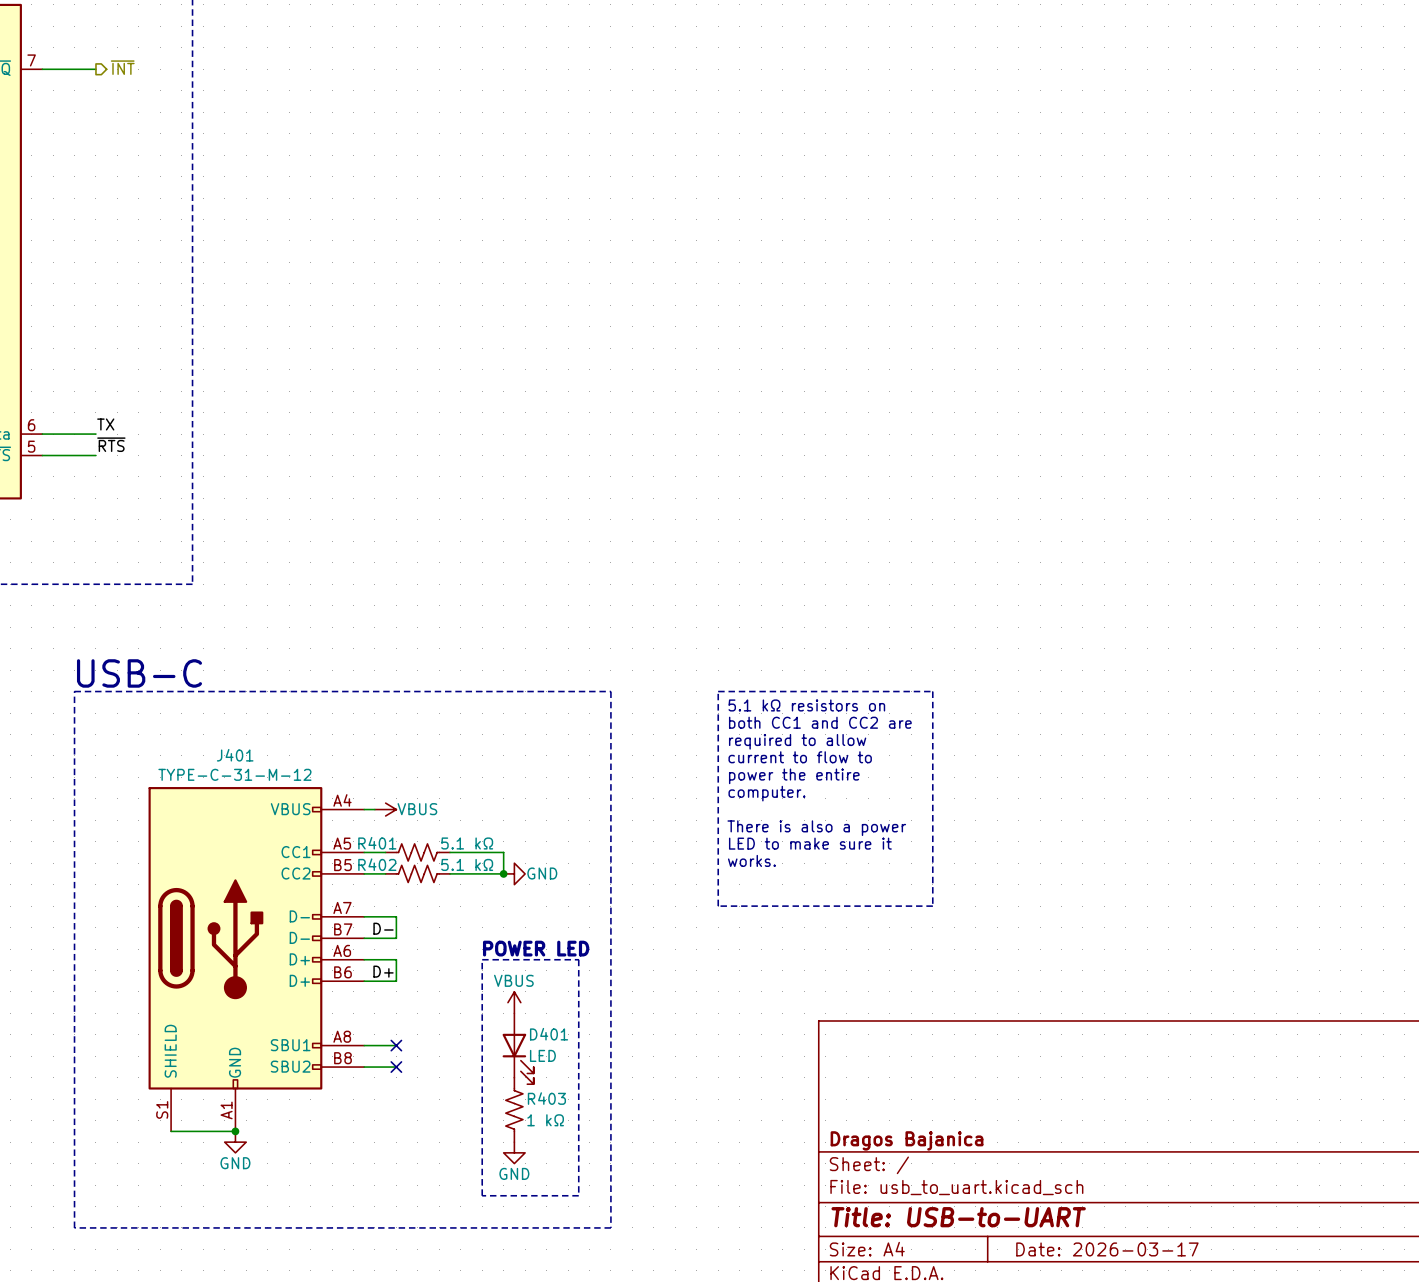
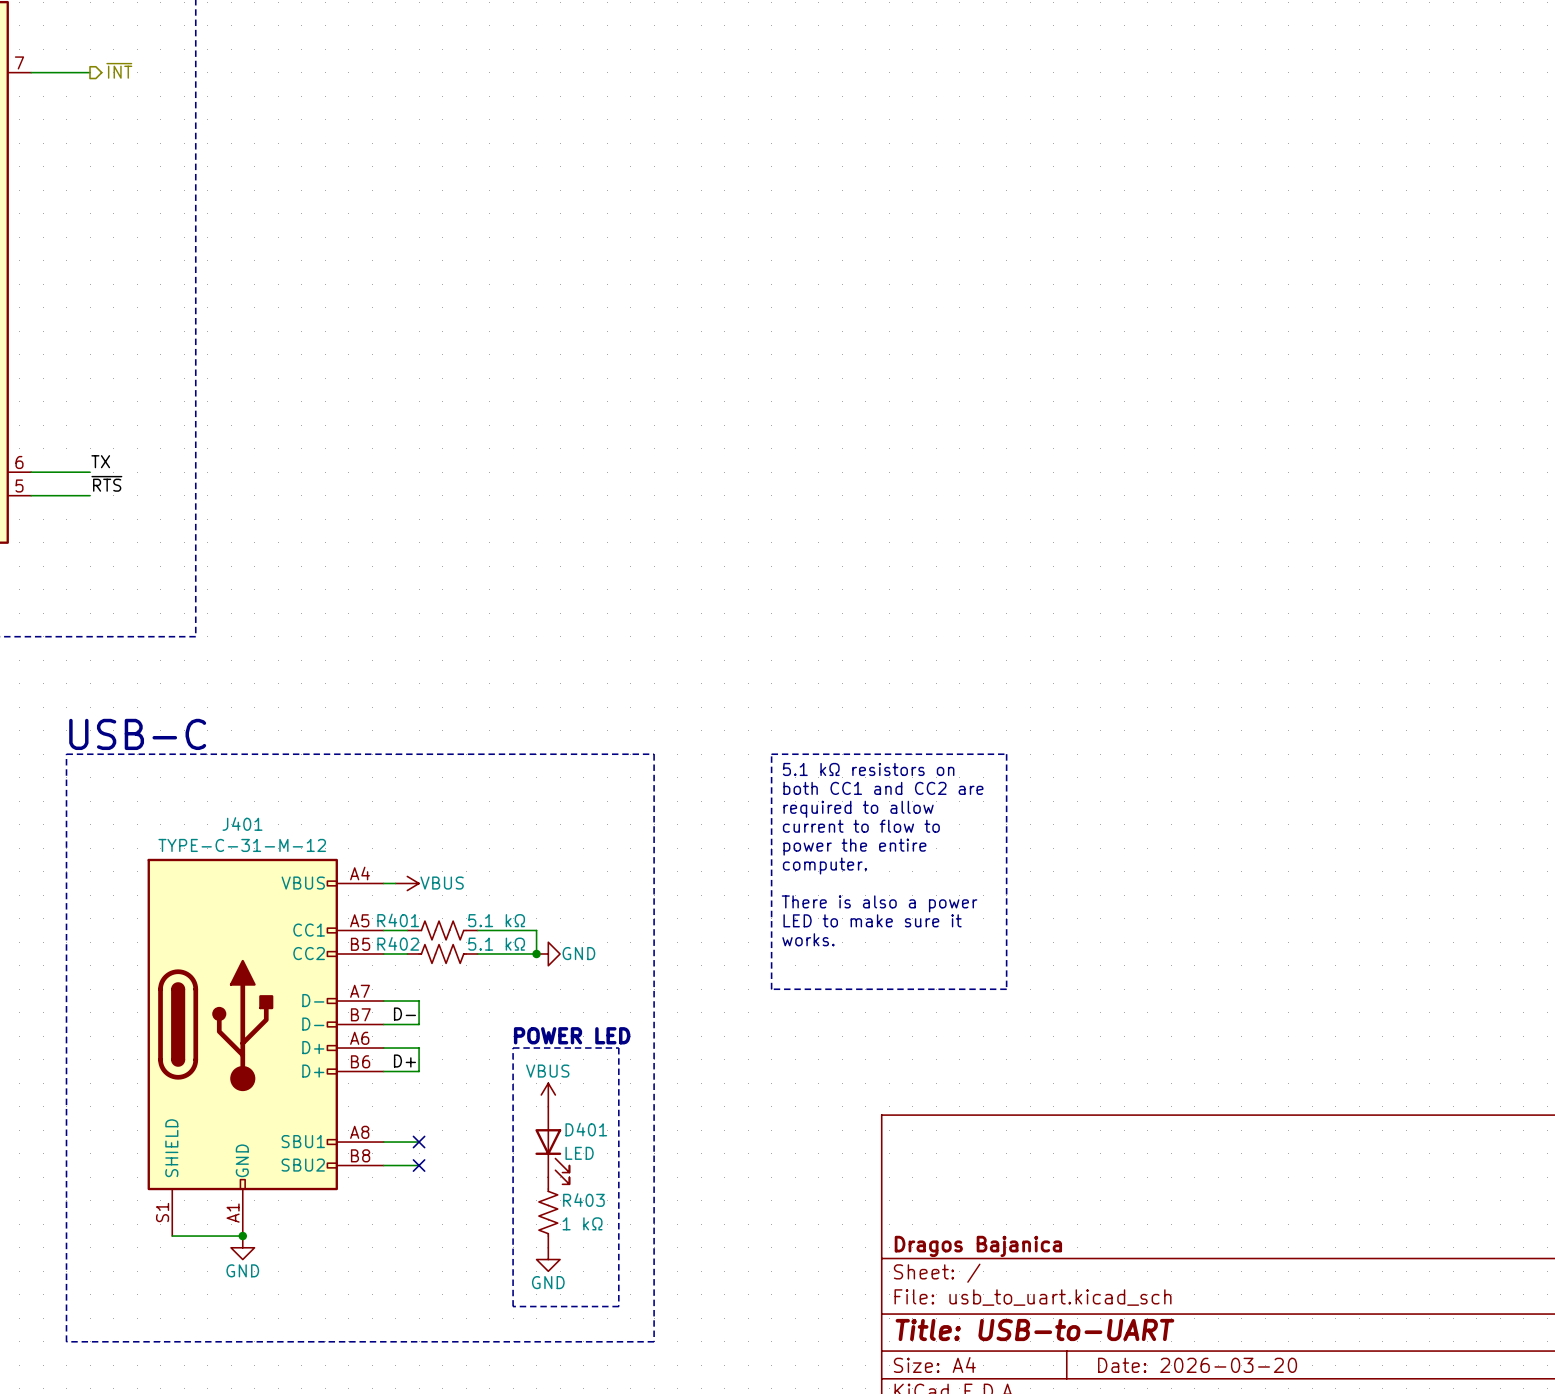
title block: Date: 2026-03-17 (1107, 1249) -> Date: 2026-03-20 (1197, 1365)

